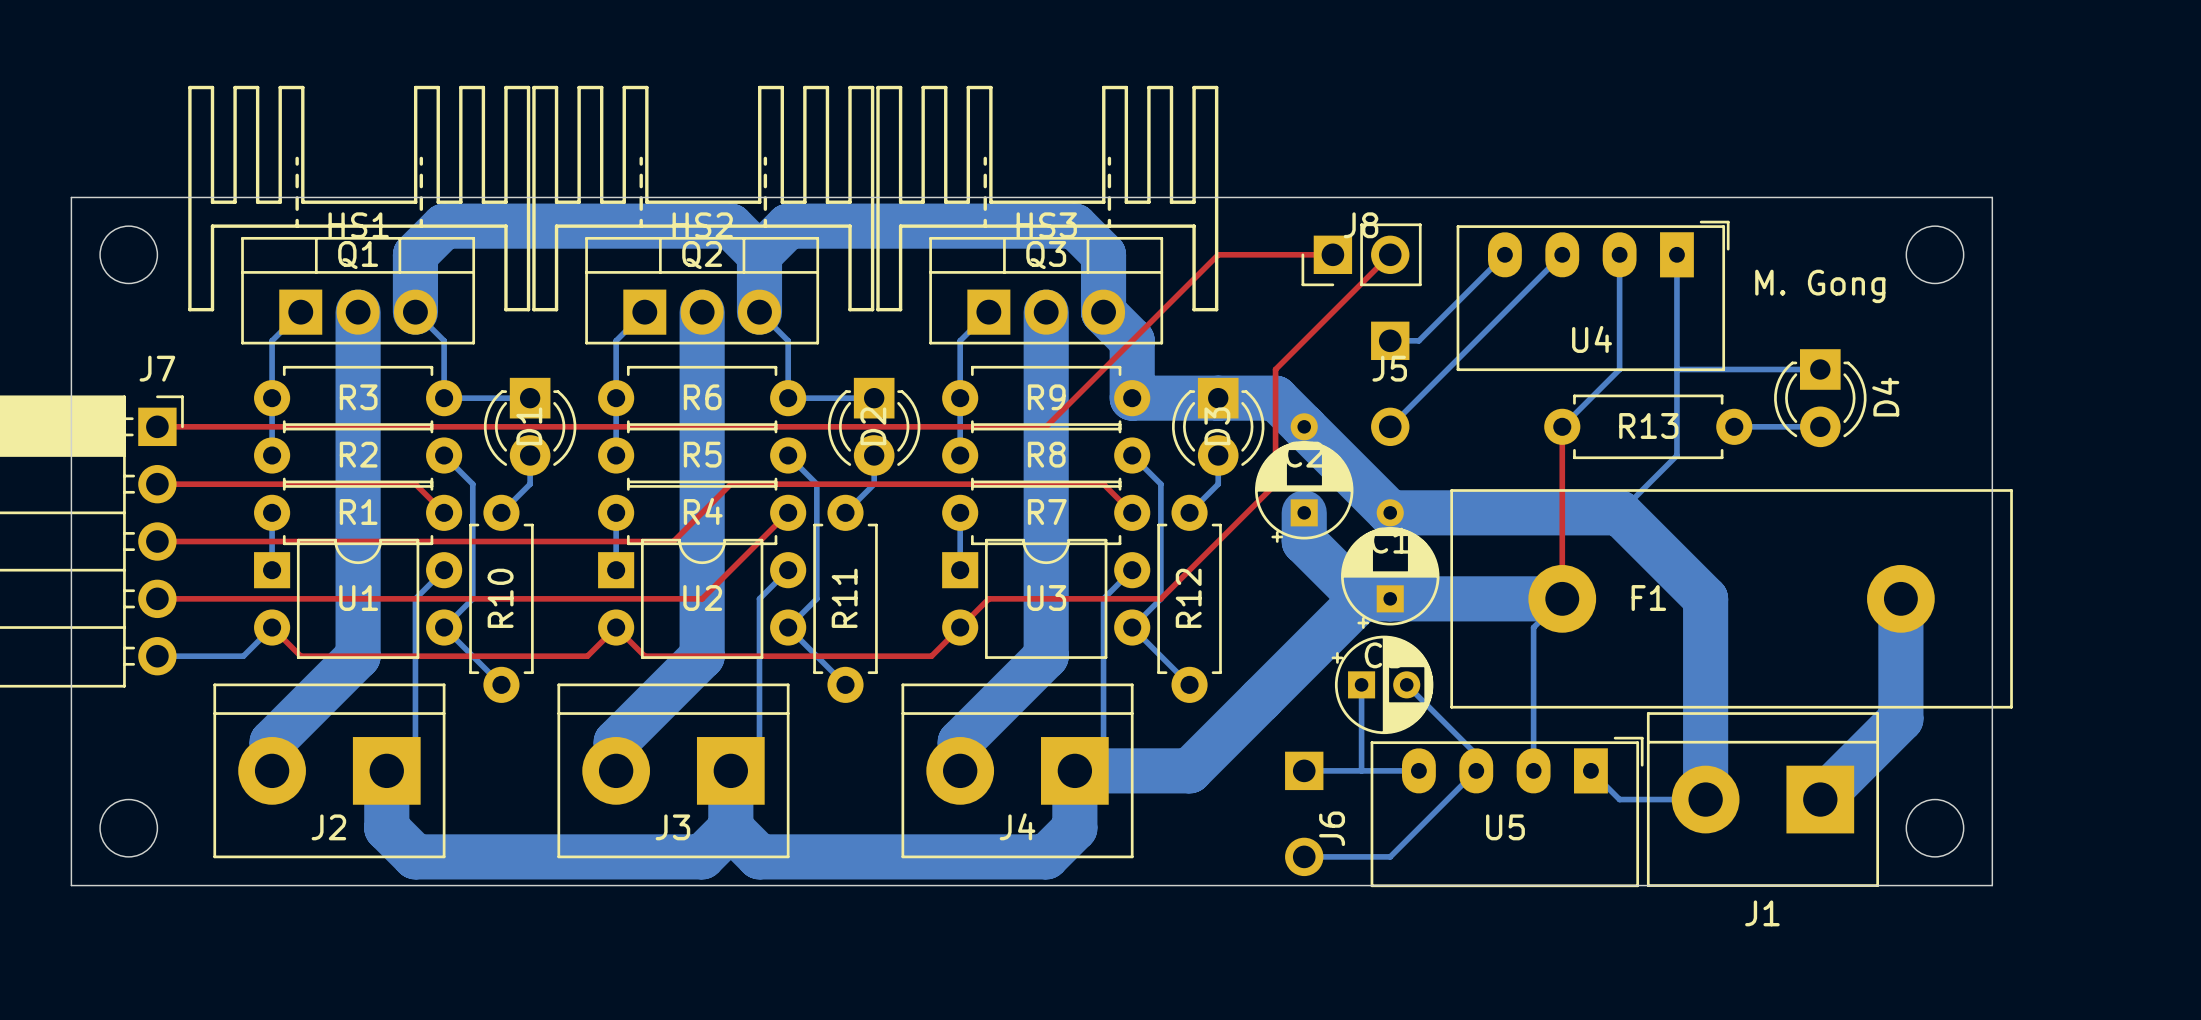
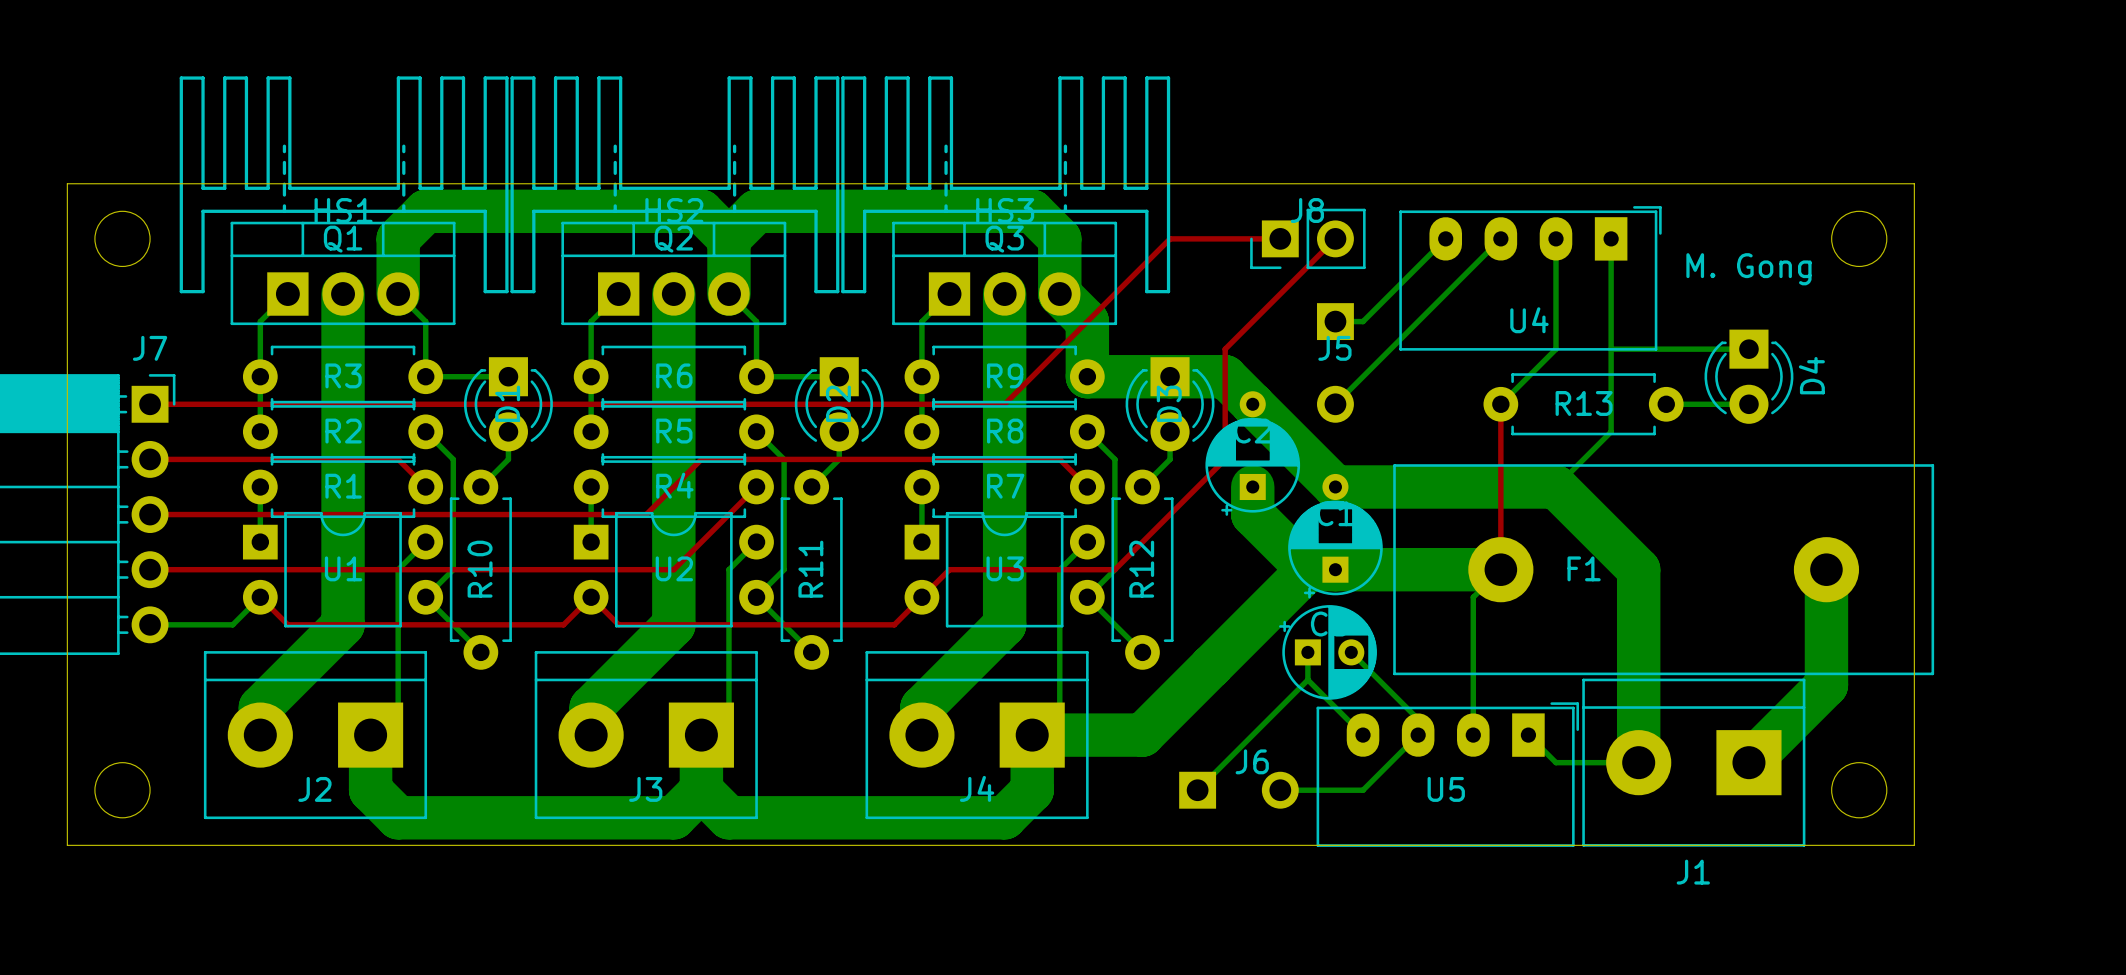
bottom track: (1361, 713) (1361, 770) -> none
bottom track: (1304, 770) (1418, 770) -> (1197, 790) (1307, 679) (1363, 735)
J6 rotation: 0° (1304, 813) -> 90° counterclockwise (1238, 790)
bottom track: (1418, 828) (1390, 856) (1304, 856) -> (1363, 790) (1280, 790)

